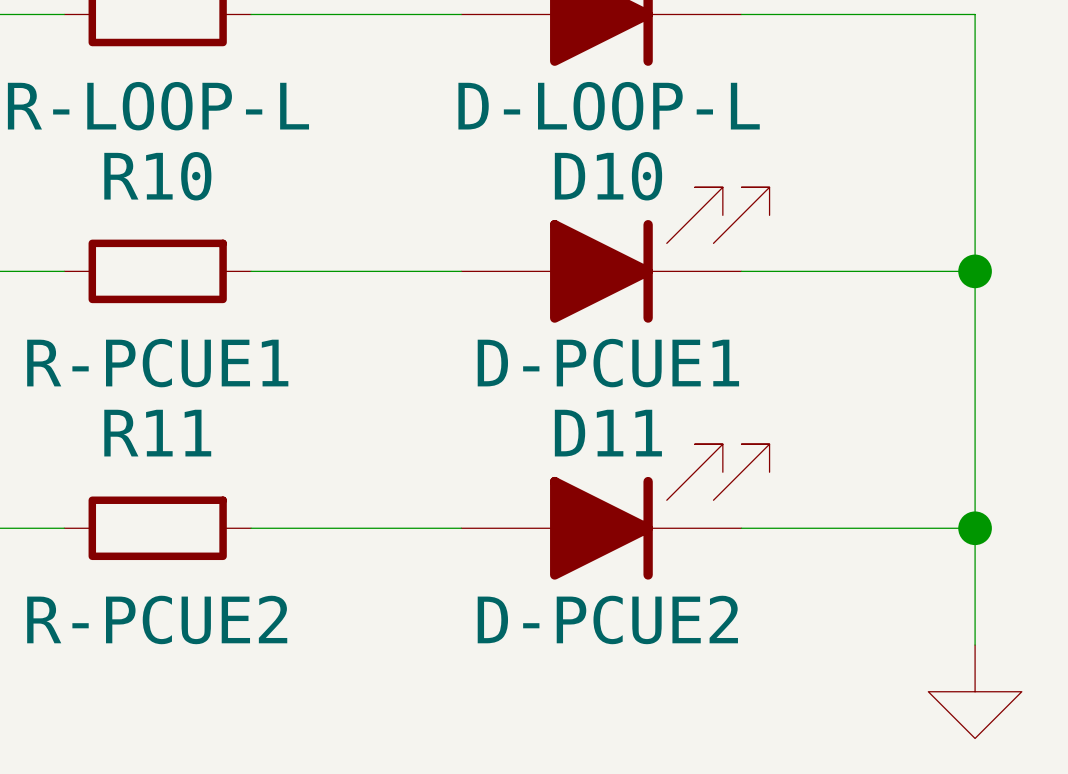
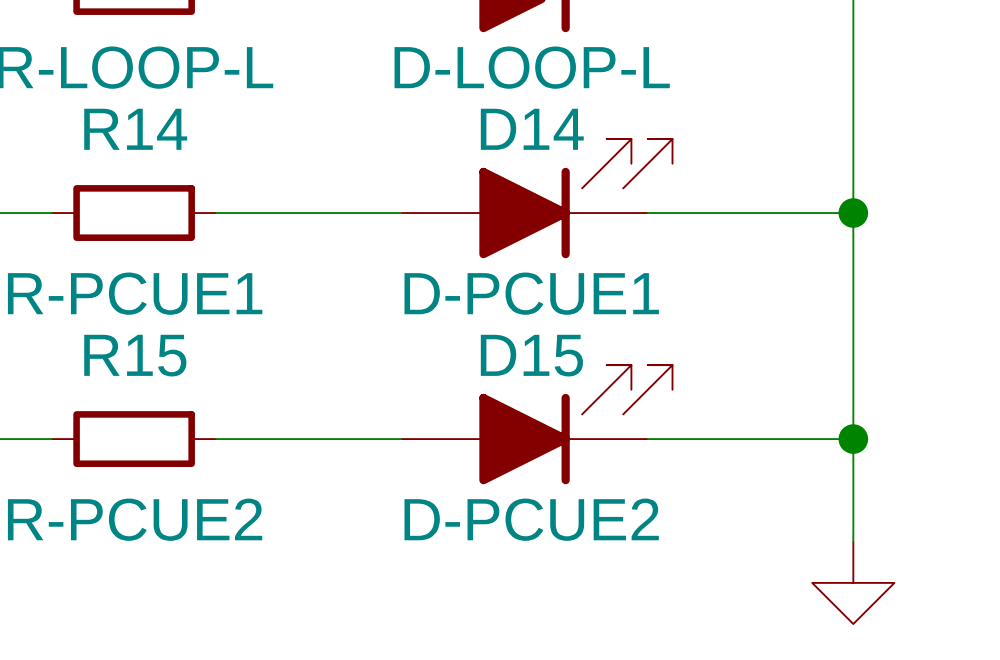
R10 name: R10 (157, 176) -> R14 (135, 129)
D10 name: D10 (608, 176) -> D14 (532, 129)
R11 name: R11 (157, 433) -> R15 (135, 355)
D11 name: D11 (608, 433) -> D15 (531, 355)

